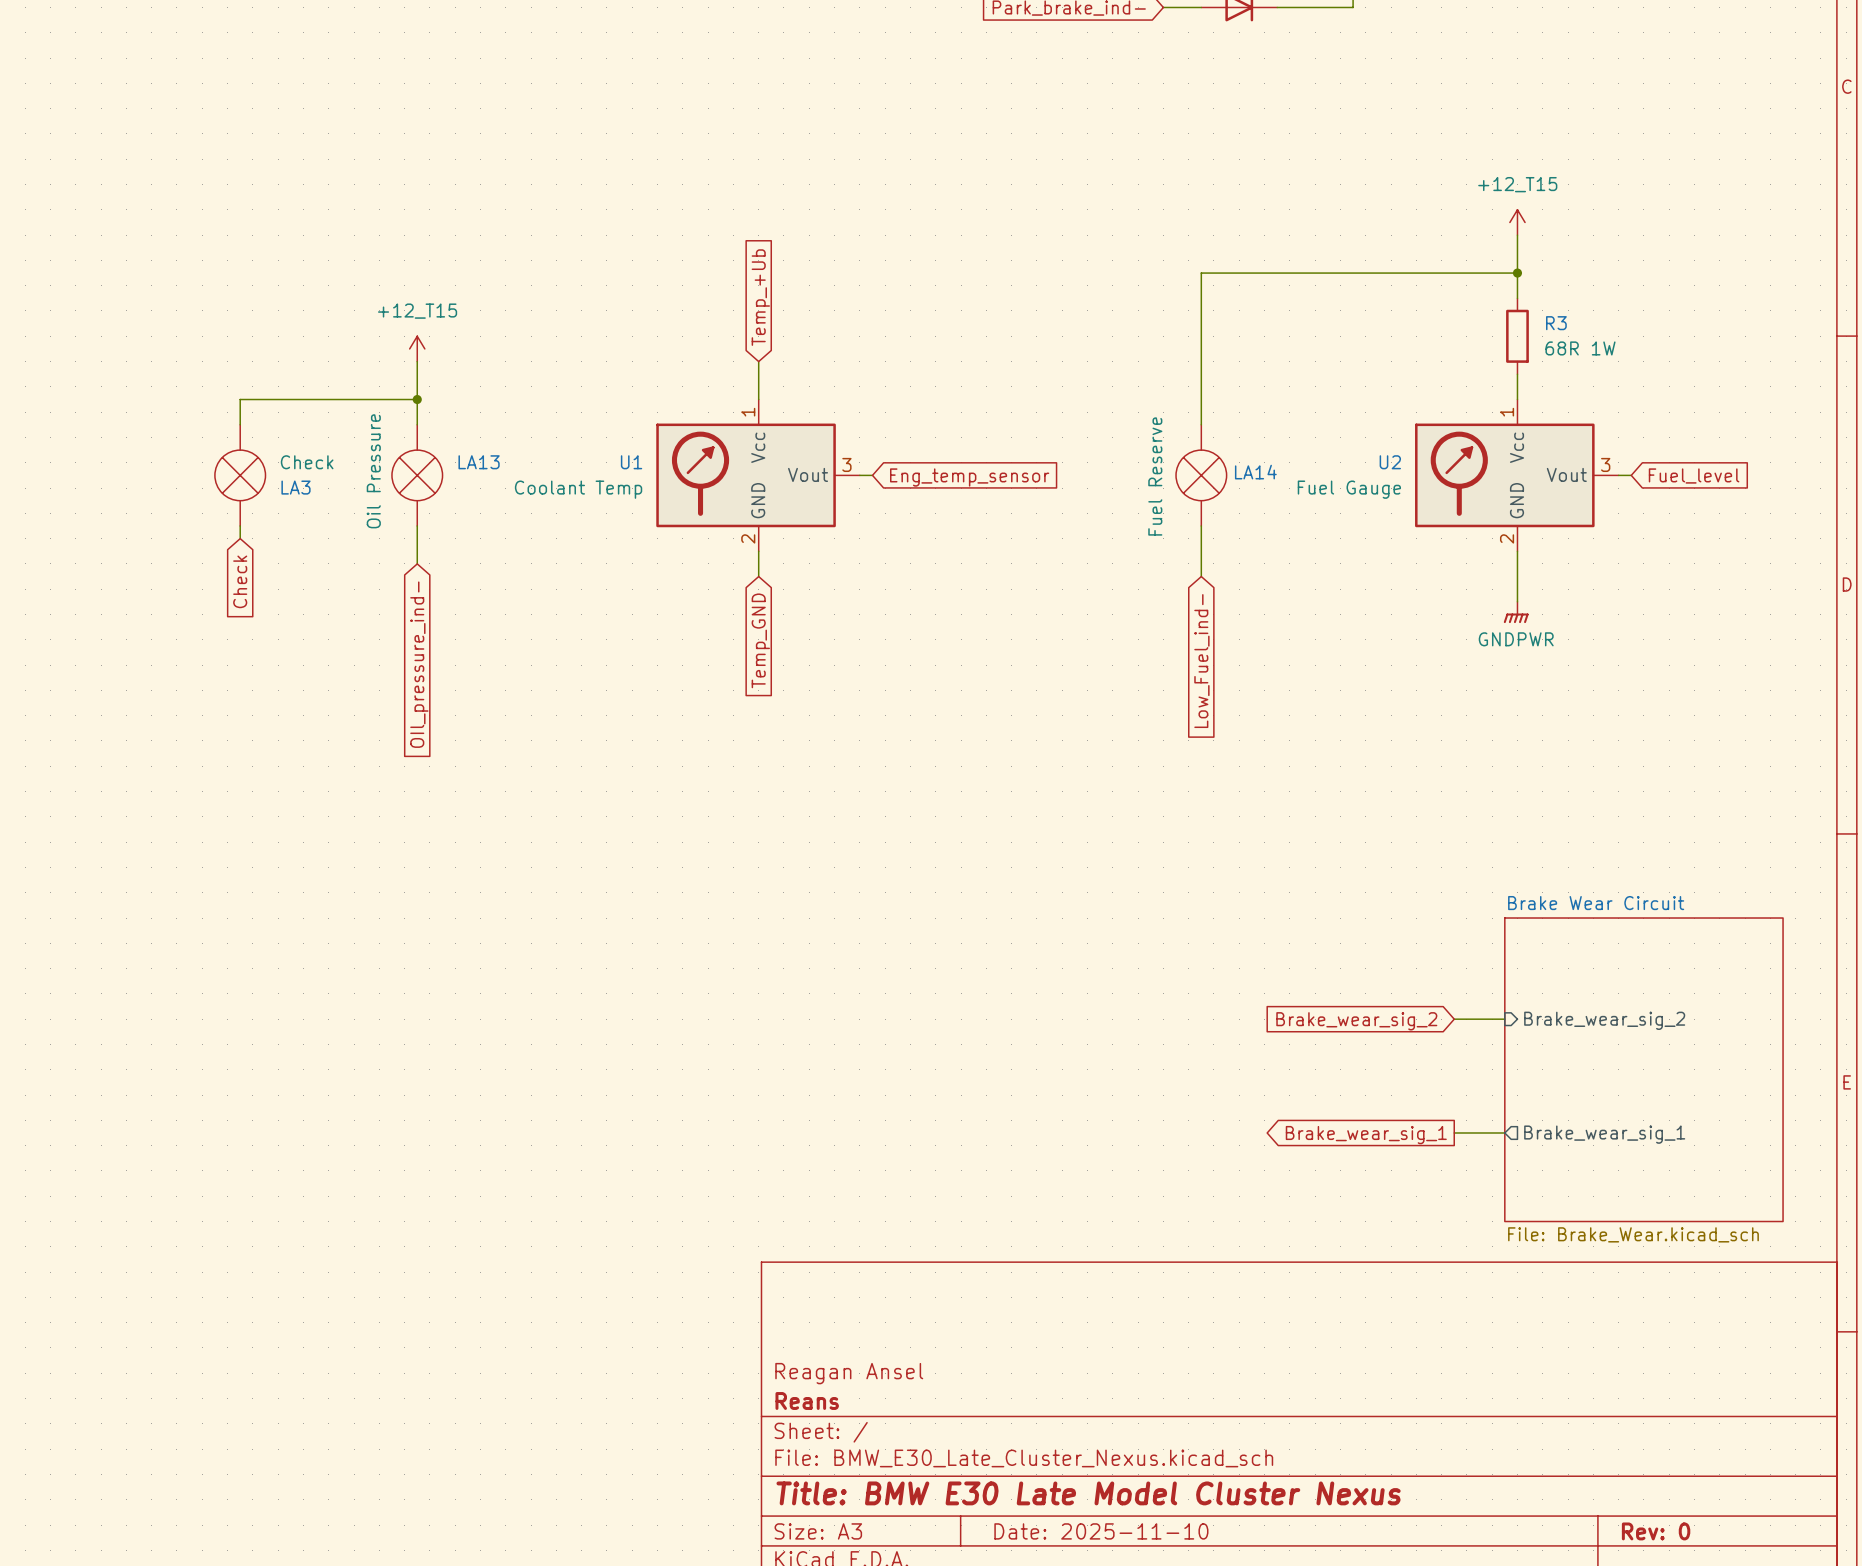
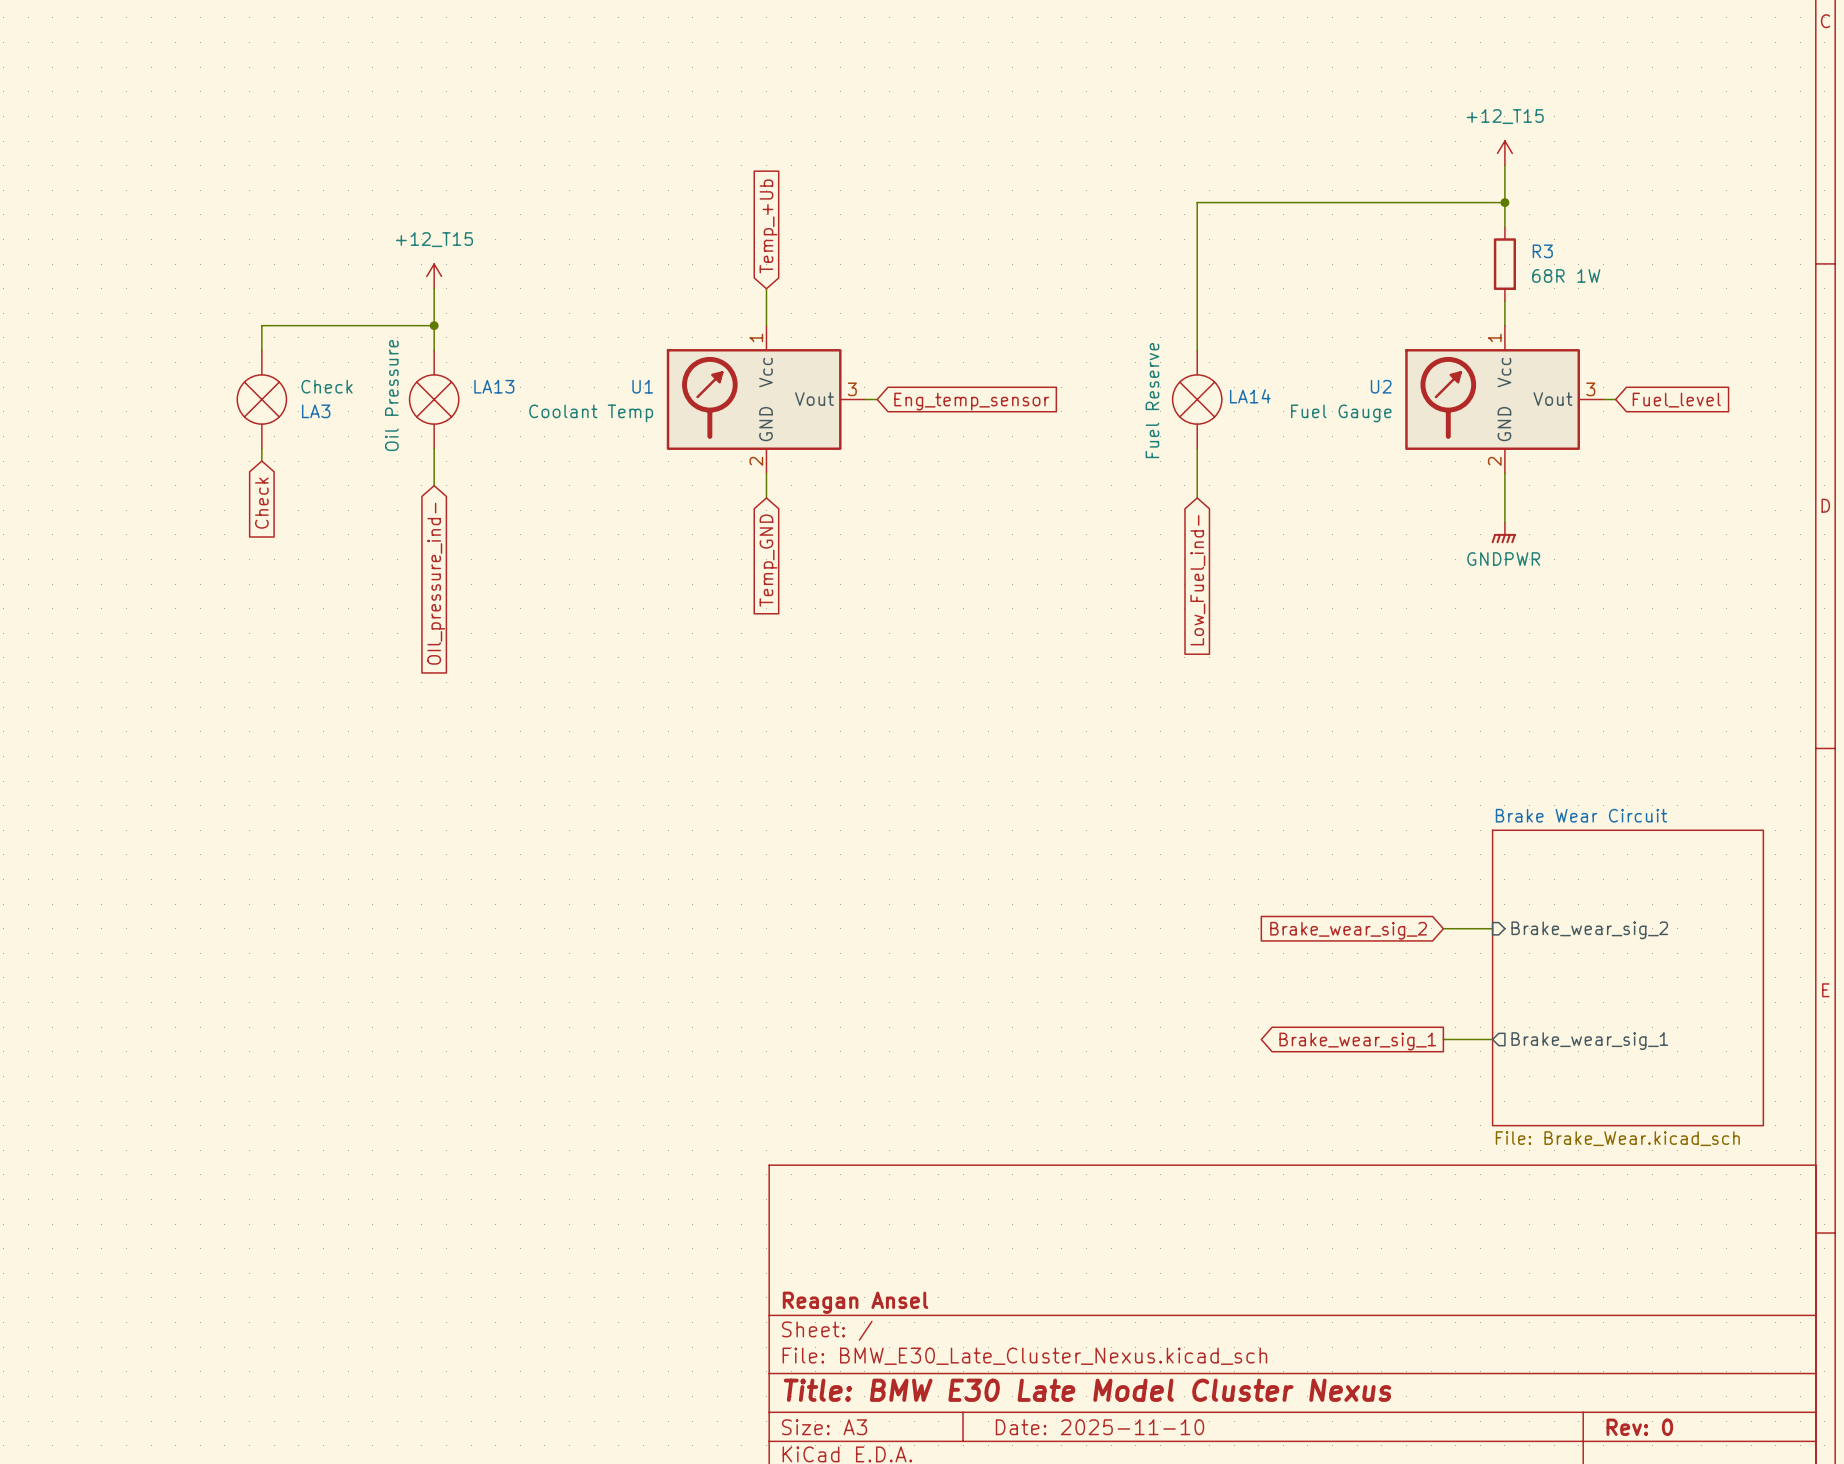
title block: Reagan Ansel (849, 1373) -> none
title block: Reans (807, 1400) -> Reagan Ansel (855, 1302)

